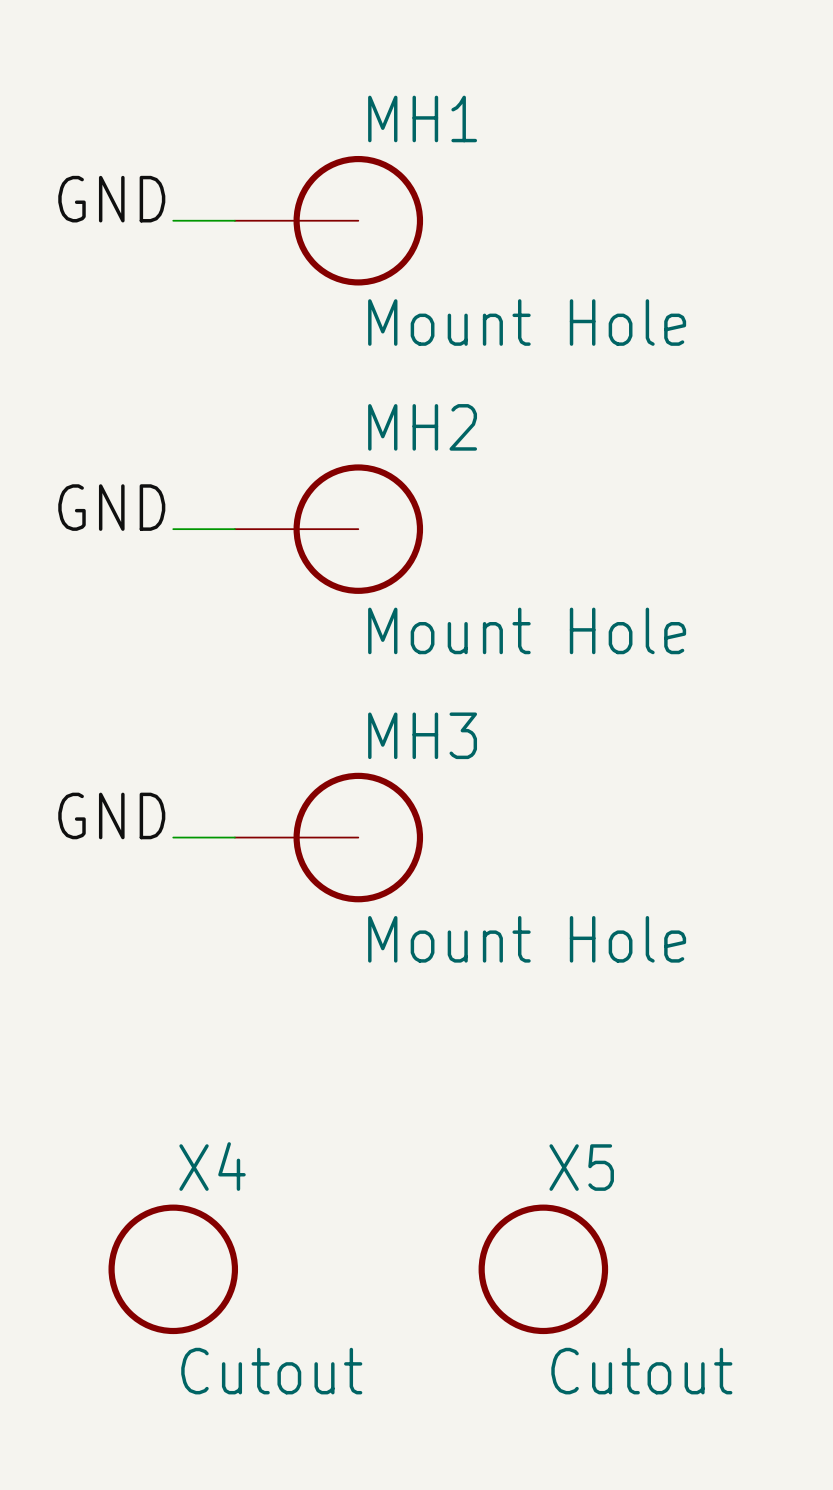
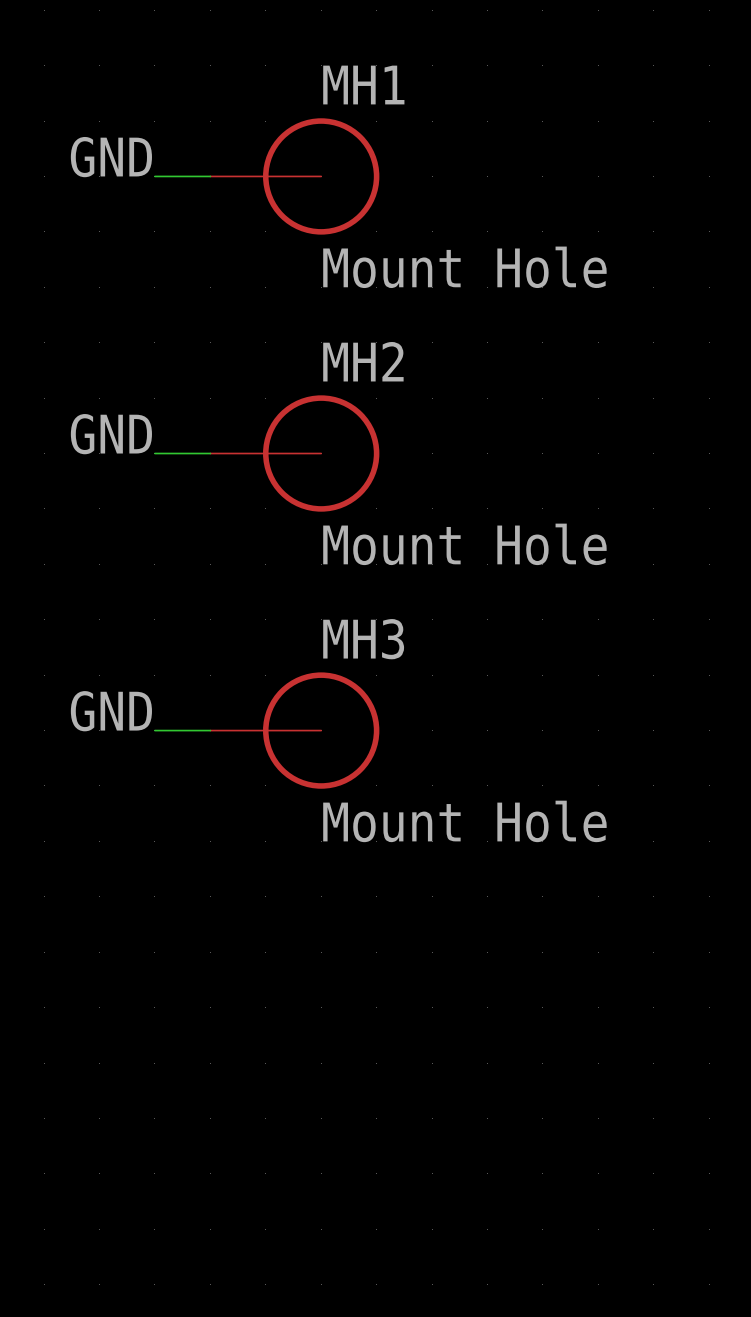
X4: (173, 1269) -> none
X5: (543, 1269) -> none

